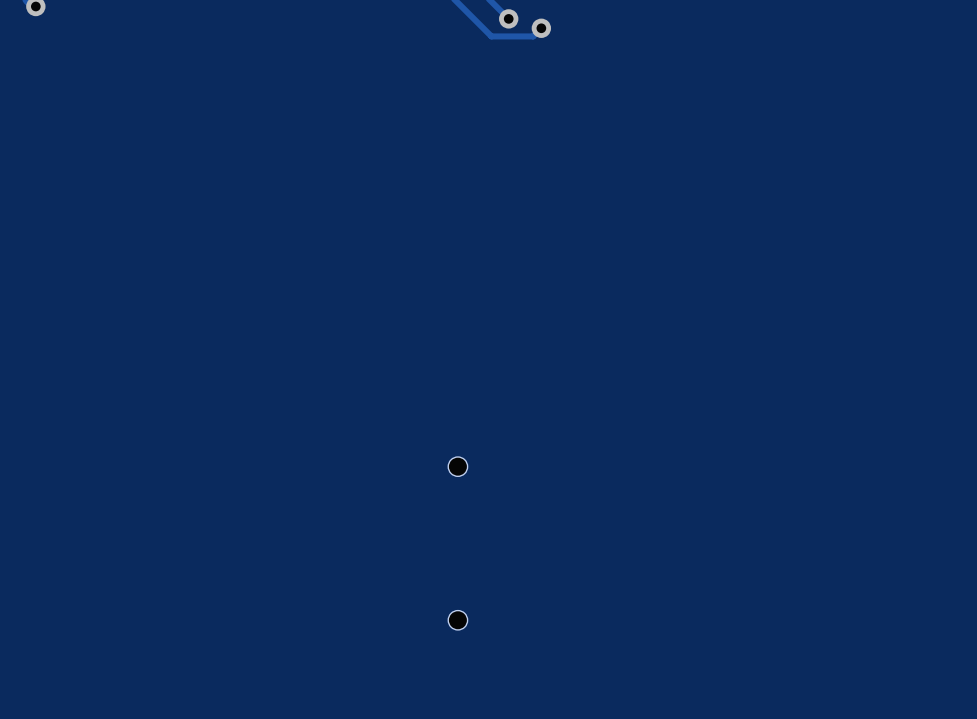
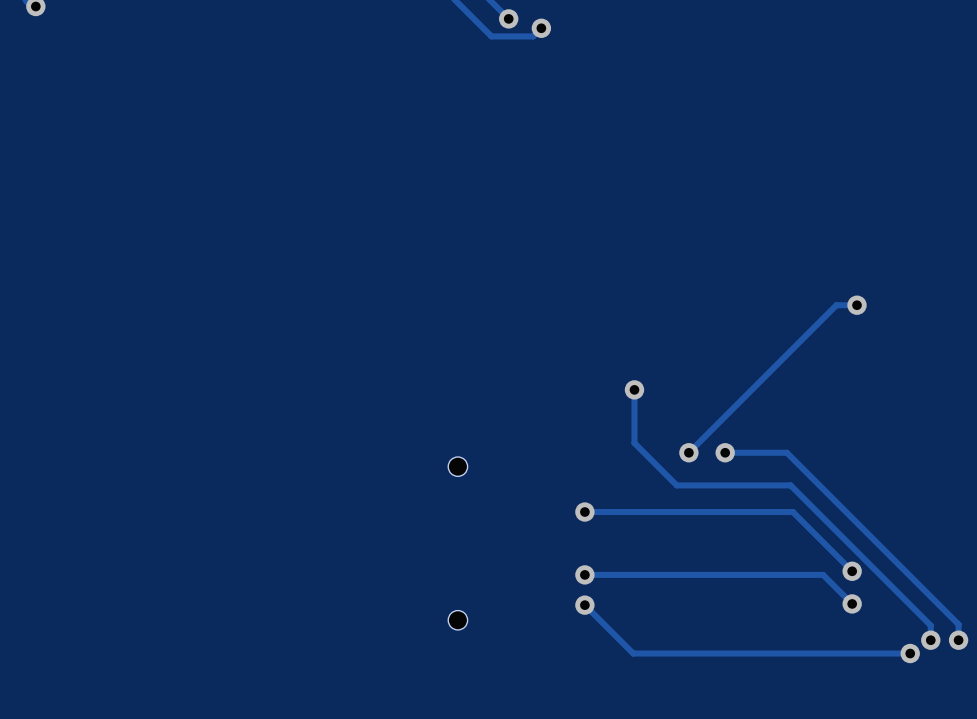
track: none -> (857, 305) (836, 305) (688, 452)
via: none -> (857, 305)
track: none -> (634, 389) (634, 443) (676, 485) (790, 485) (930, 625) (930, 640)
via: none -> (634, 389)
via: none -> (688, 452)
track: none -> (725, 452) (786, 452) (958, 624) (958, 640)
via: none -> (725, 452)
track: none -> (584, 512) (792, 512) (852, 571)
via: none -> (584, 512)
via: none -> (852, 571)
track: none -> (584, 574) (823, 574) (852, 603)
via: none -> (584, 574)
via: none -> (852, 603)
track: none -> (584, 605) (633, 653) (910, 653)
via: none -> (584, 605)
via: none -> (930, 640)
via: none -> (958, 640)
via: none -> (910, 653)

